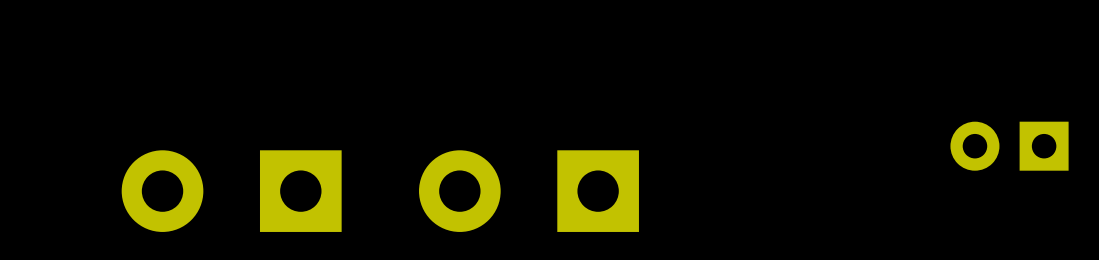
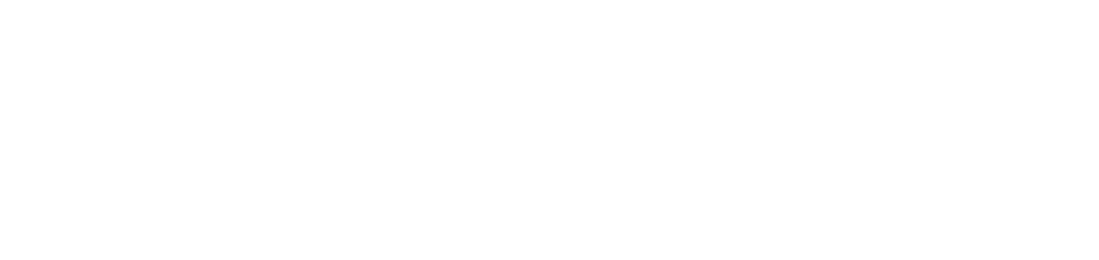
part: (1009, 146) -> none
part: (231, 191) -> none
part: (528, 191) -> none

